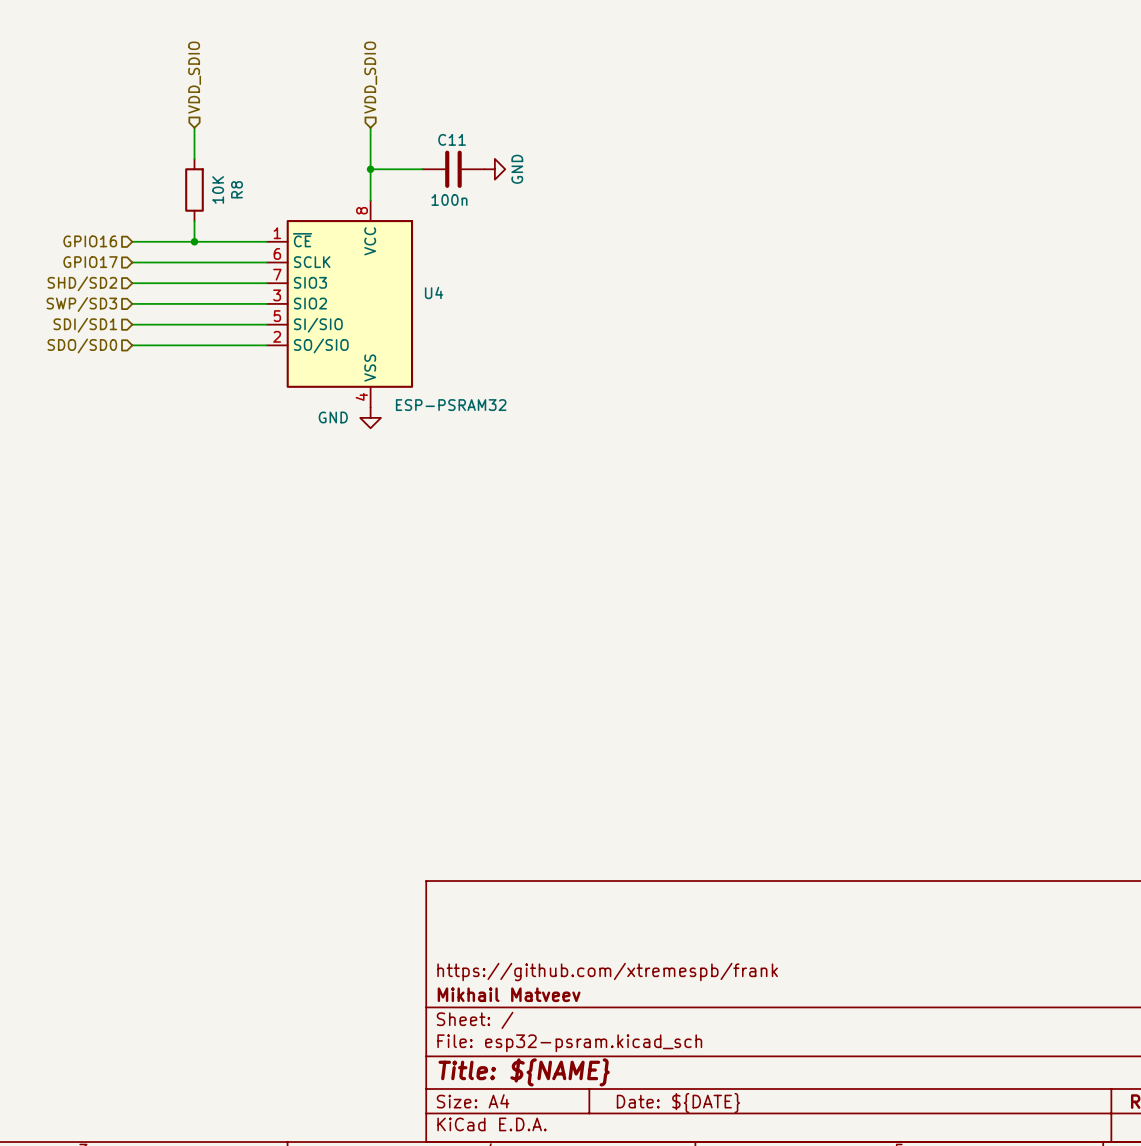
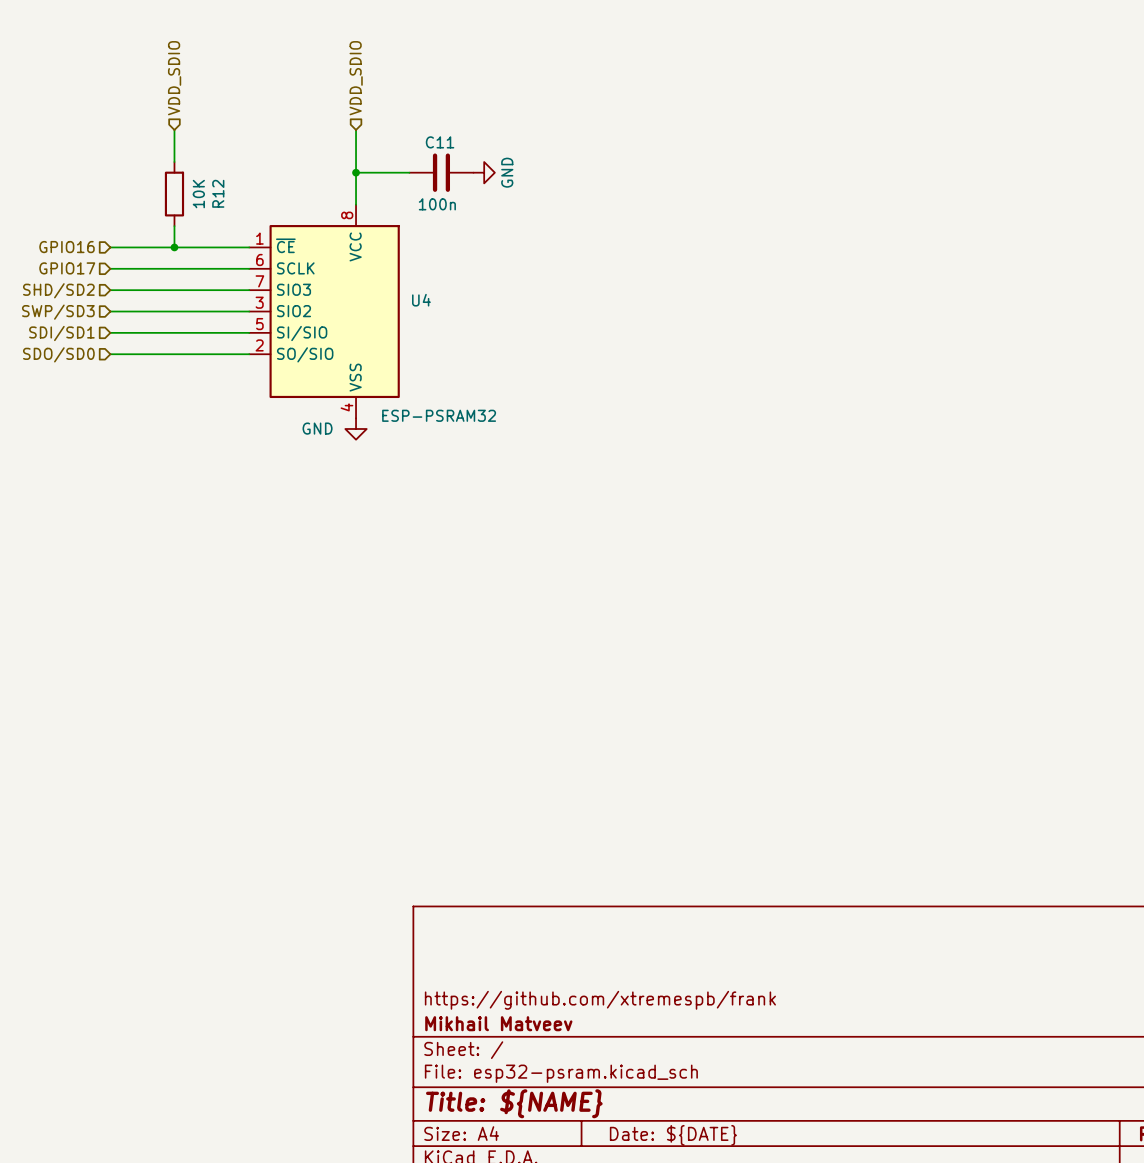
R8 name: R8 (236, 189) -> R12 (218, 193)

